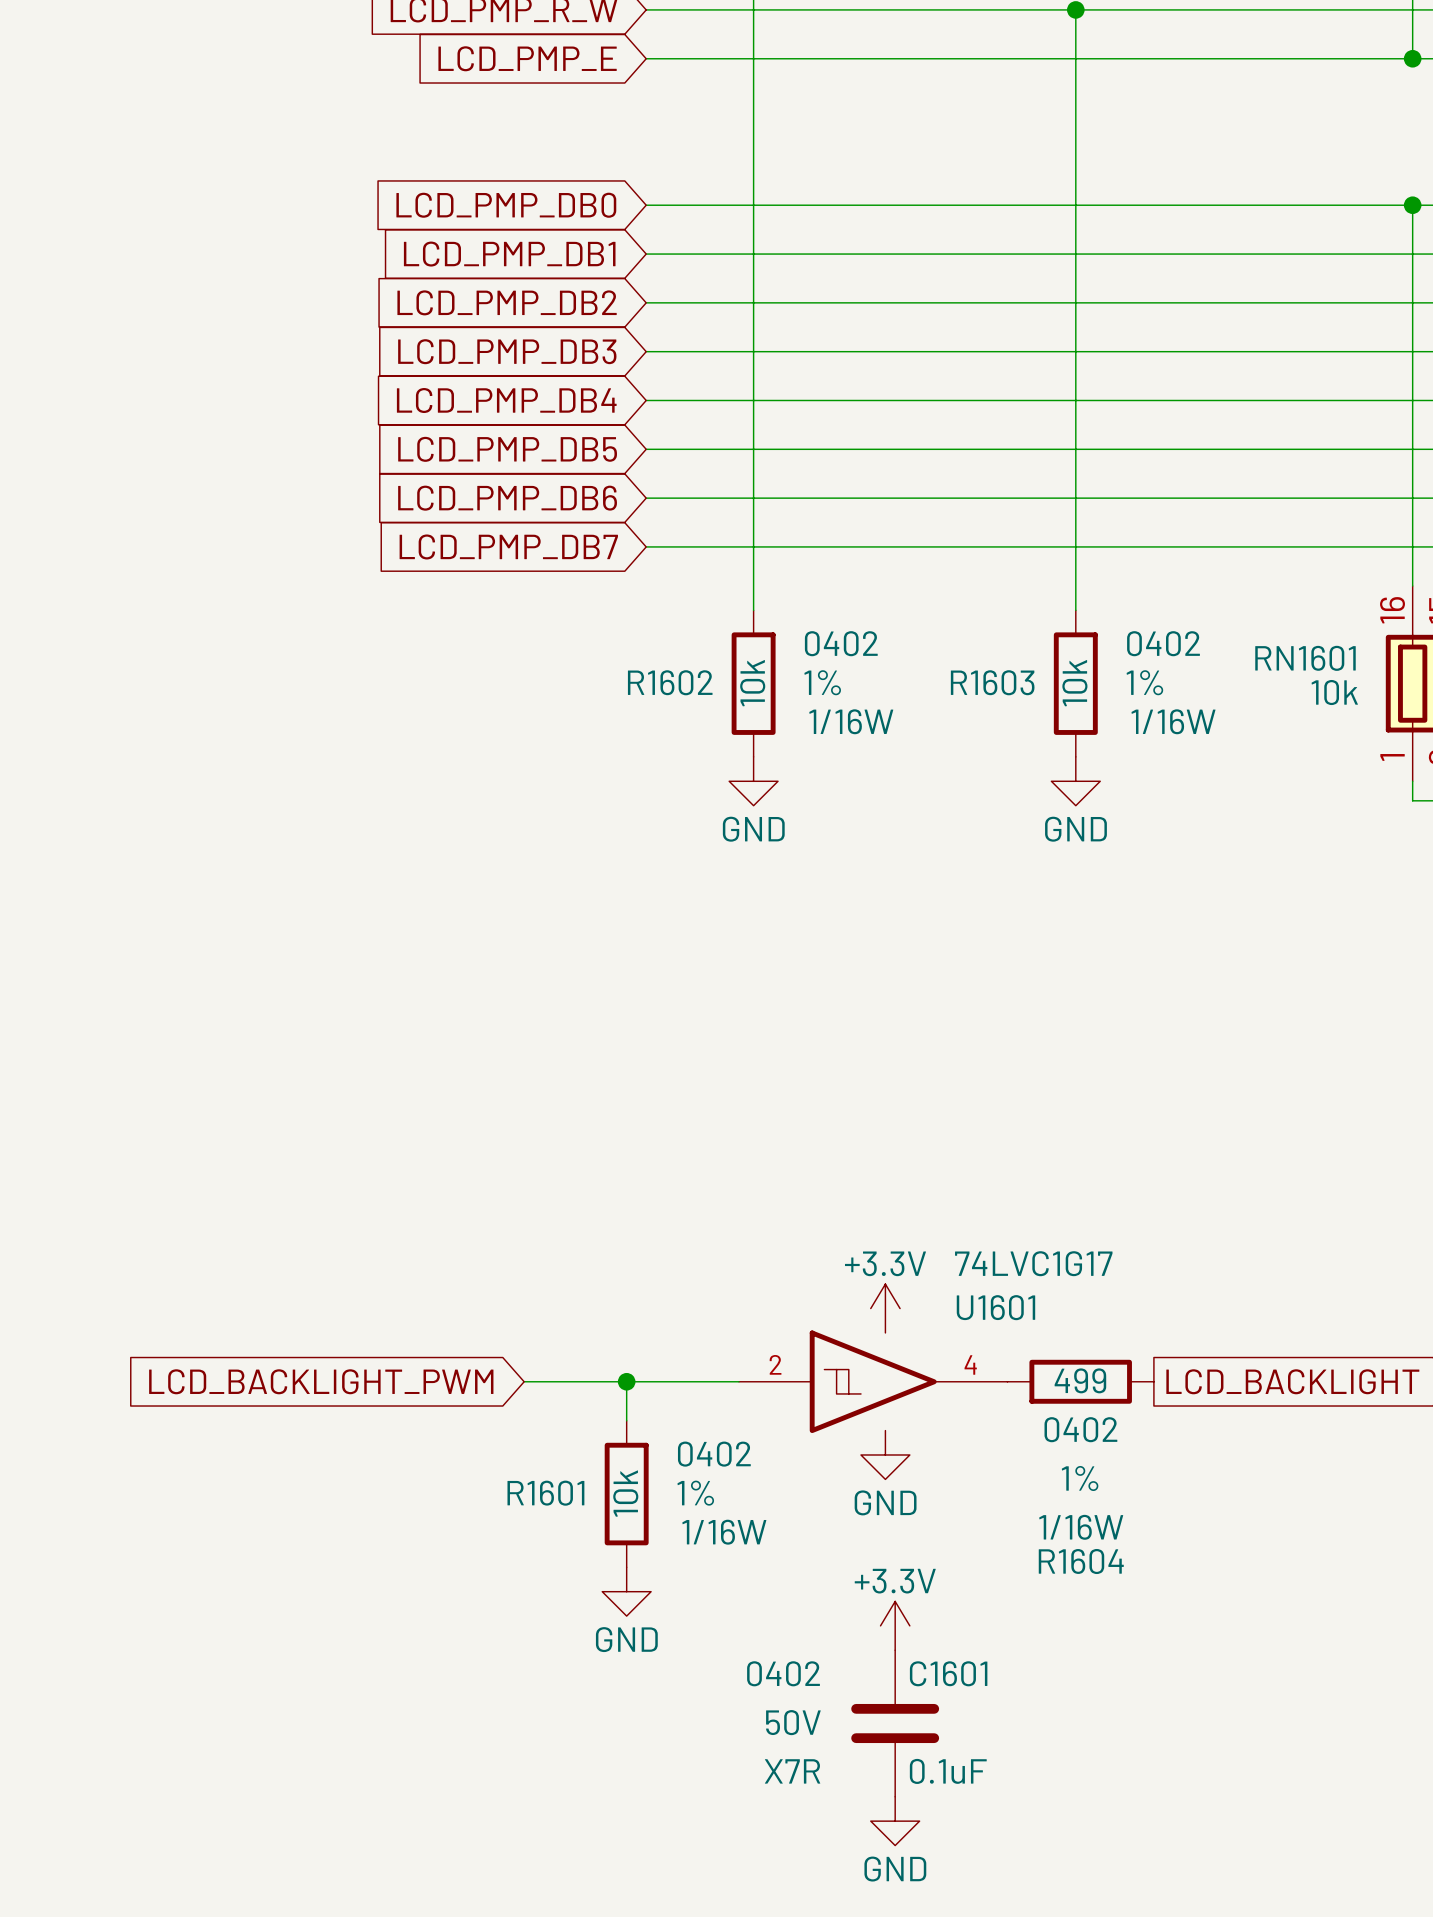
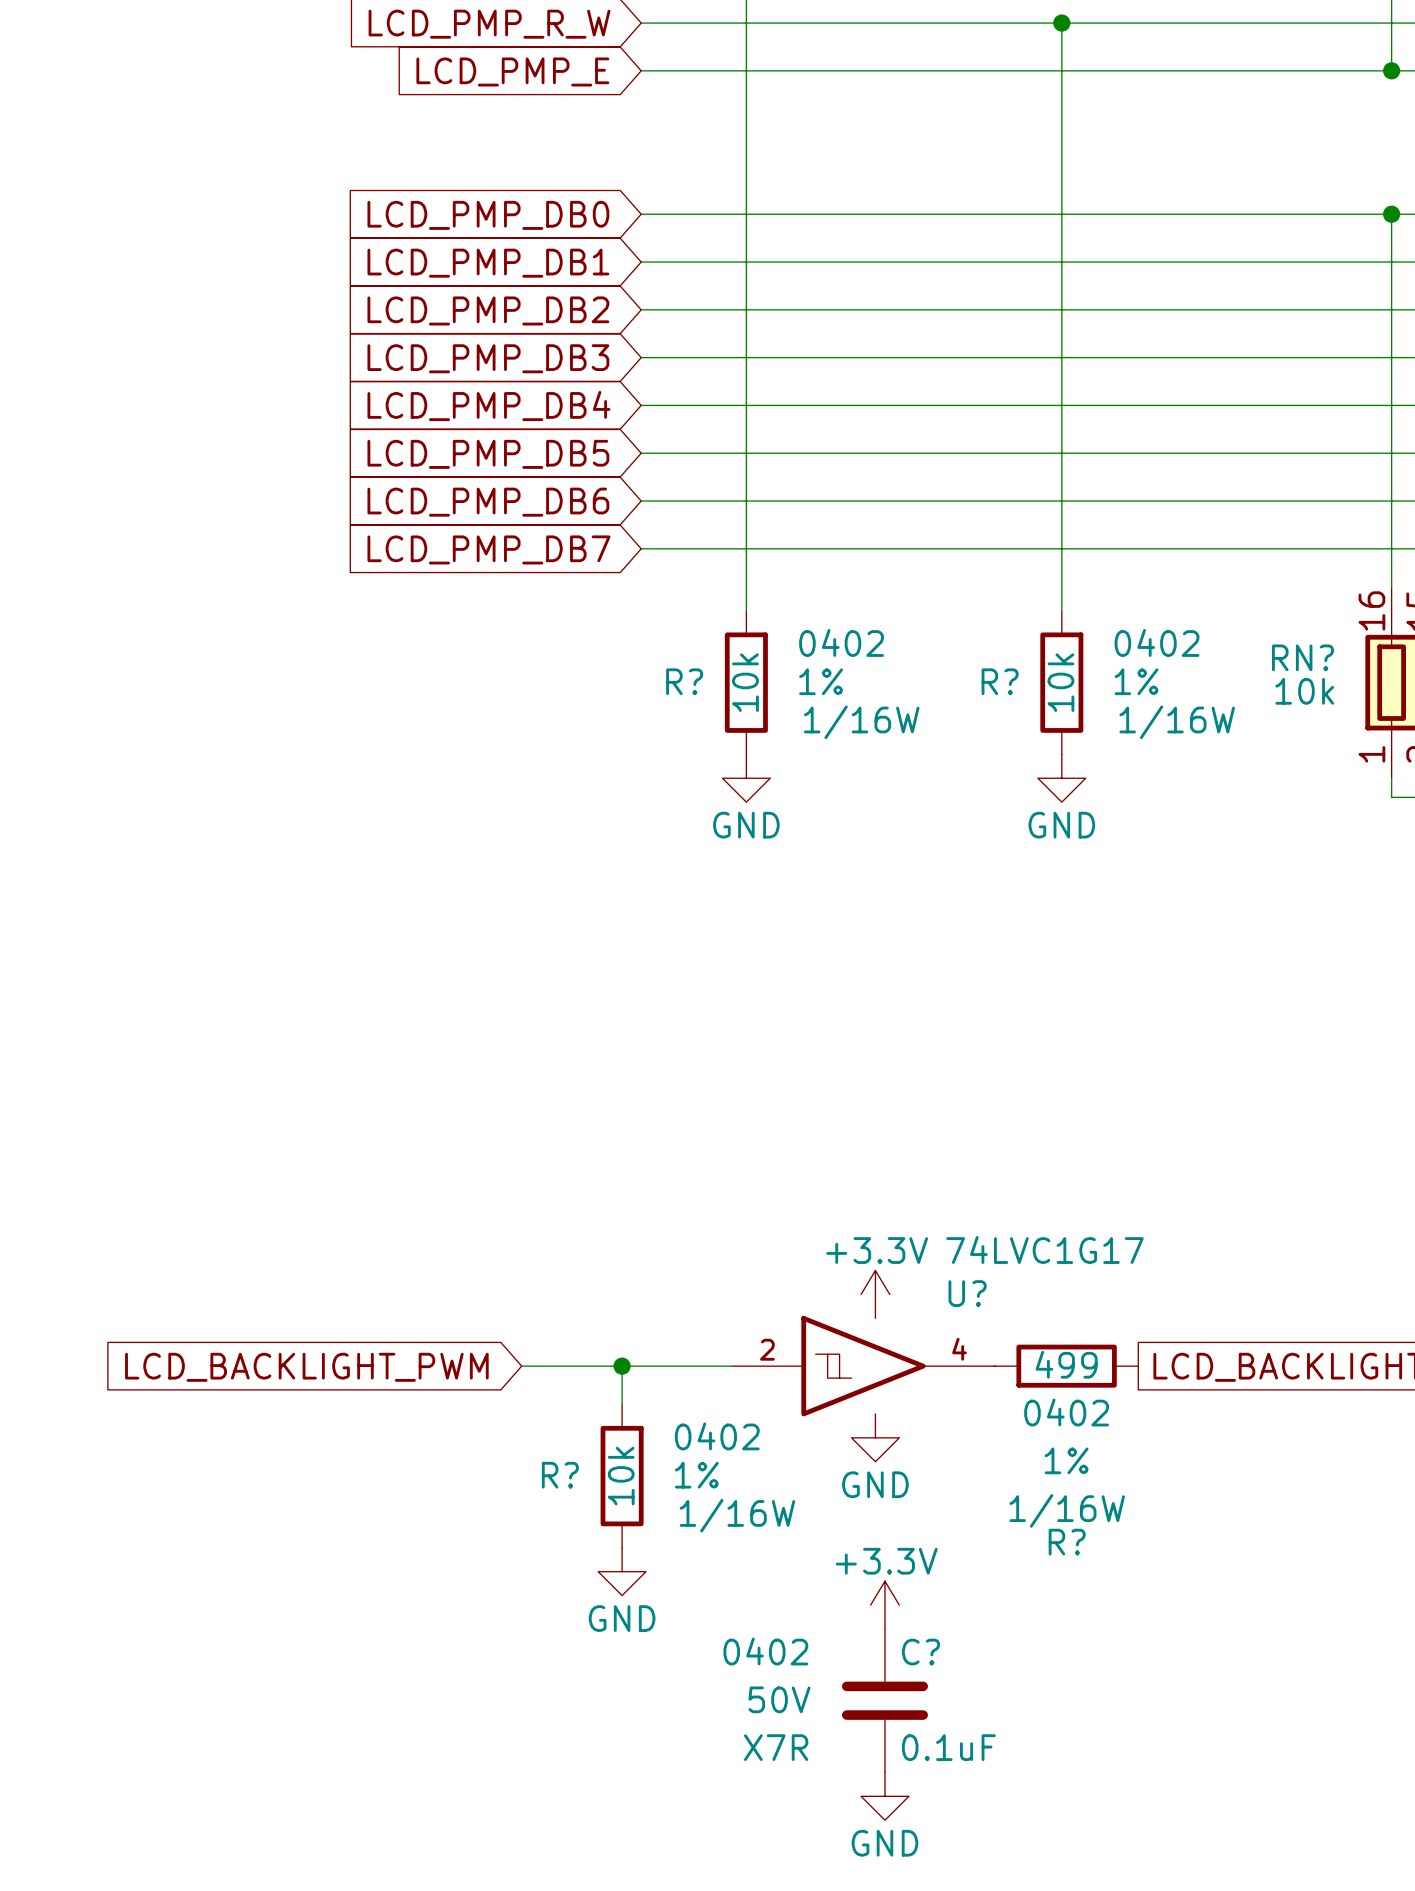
RN1601 name: RN1601 (1305, 658) -> RN? (1303, 657)
R1602 name: R1602 (670, 682) -> R? (684, 681)
R1603 name: R1603 (992, 682) -> R? (1000, 681)
U1601 name: U1601 (995, 1307) -> U? (967, 1293)
R1601 name: R1601 (545, 1493) -> R? (560, 1475)
R1604 name: R1604 (1081, 1561) -> R? (1067, 1542)
C1601 name: C1601 (948, 1673) -> C? (921, 1652)

